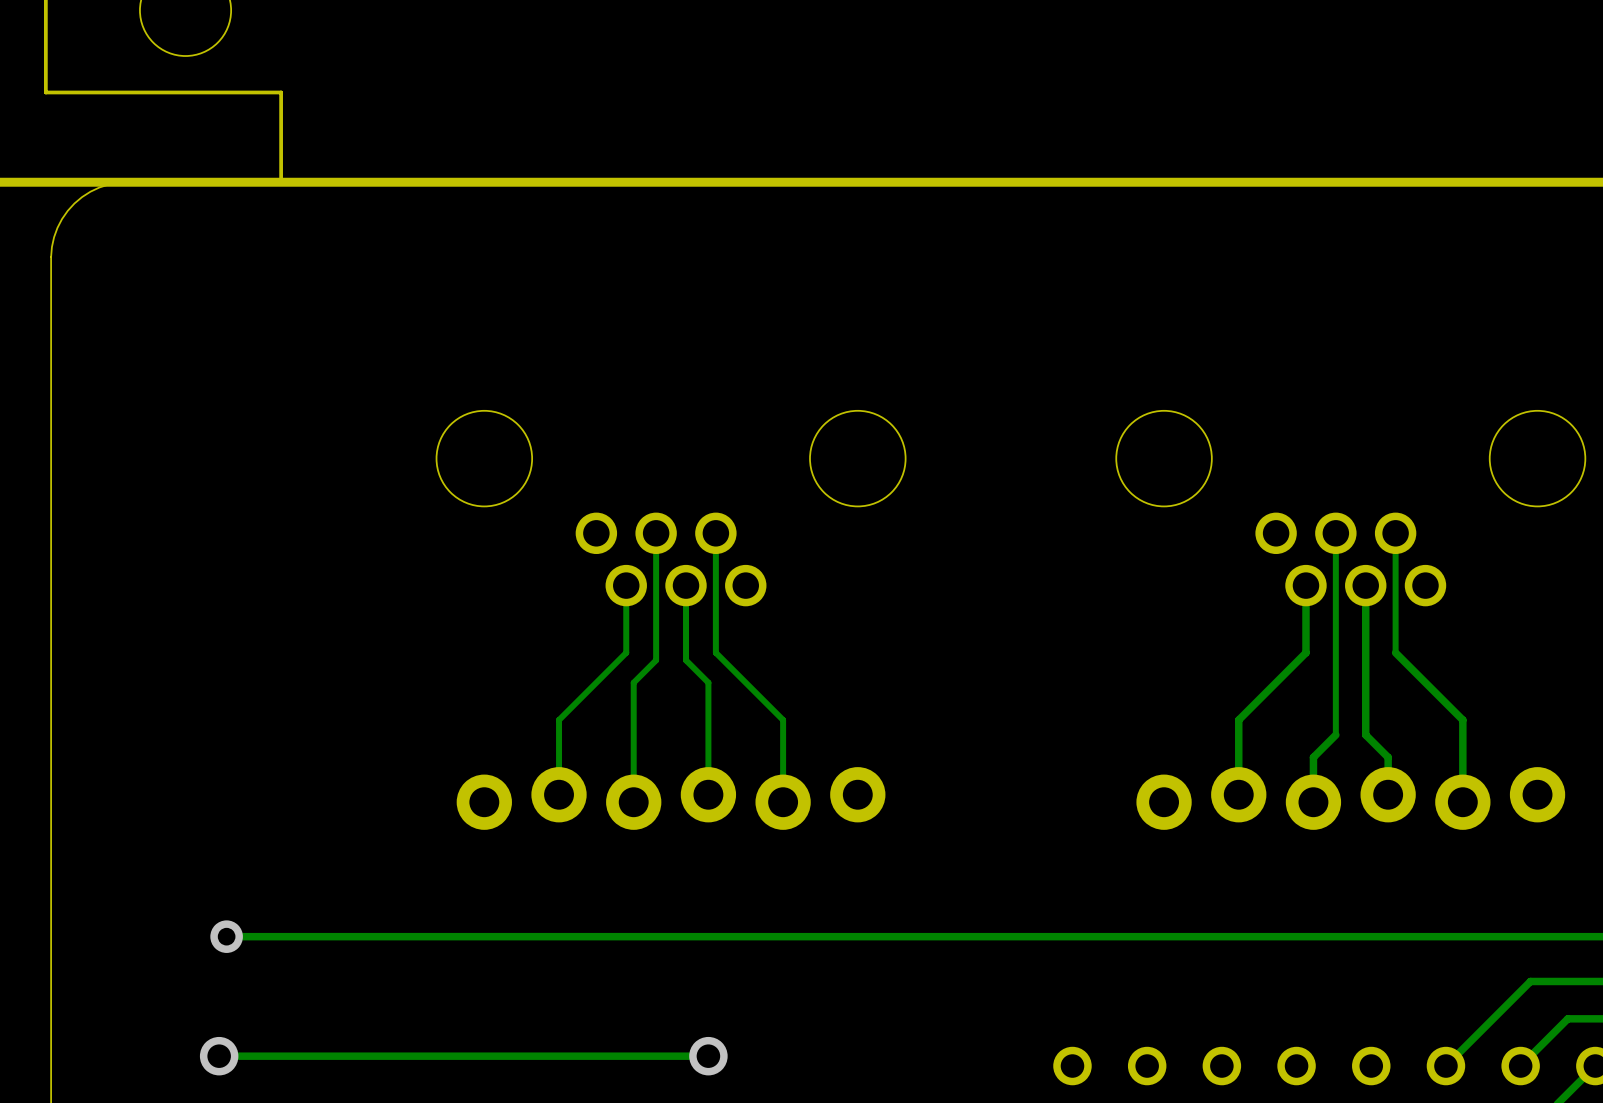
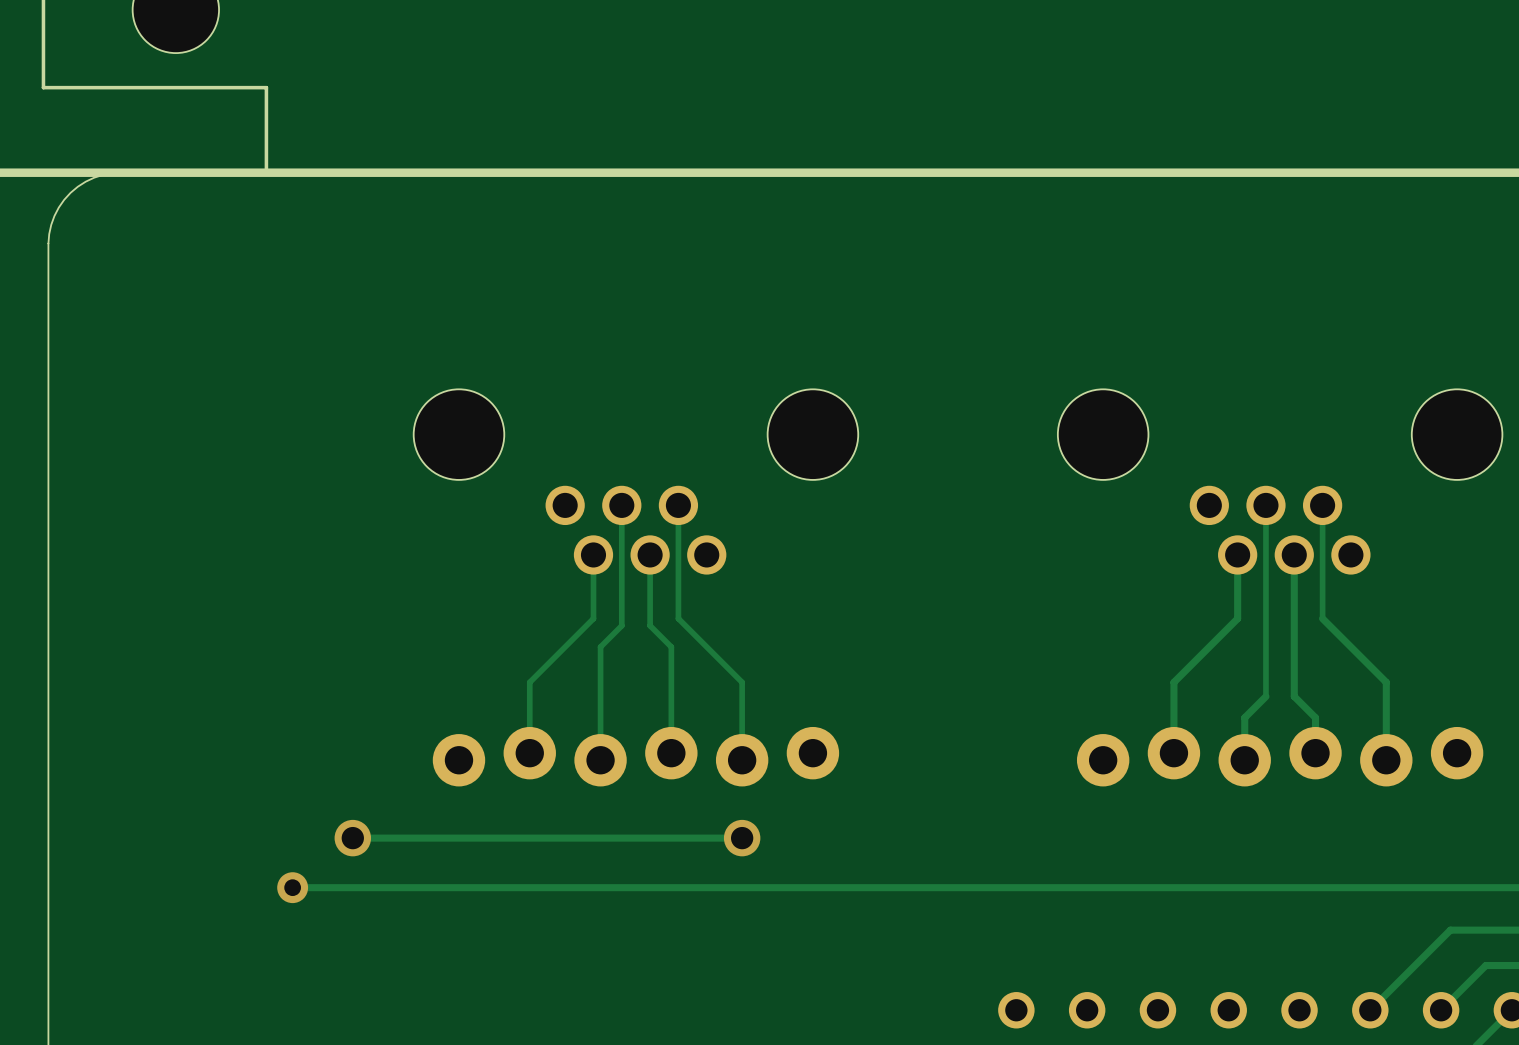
via: none -> (352, 838)
track: none -> (742, 838) (352, 838)
via: none -> (742, 838)
via position: (226, 936) -> (292, 887)
track: (308, 936) (226, 936) -> none
via: (219, 1056) -> none
track: (708, 1056) (219, 1056) -> none
via: (708, 1056) -> none

